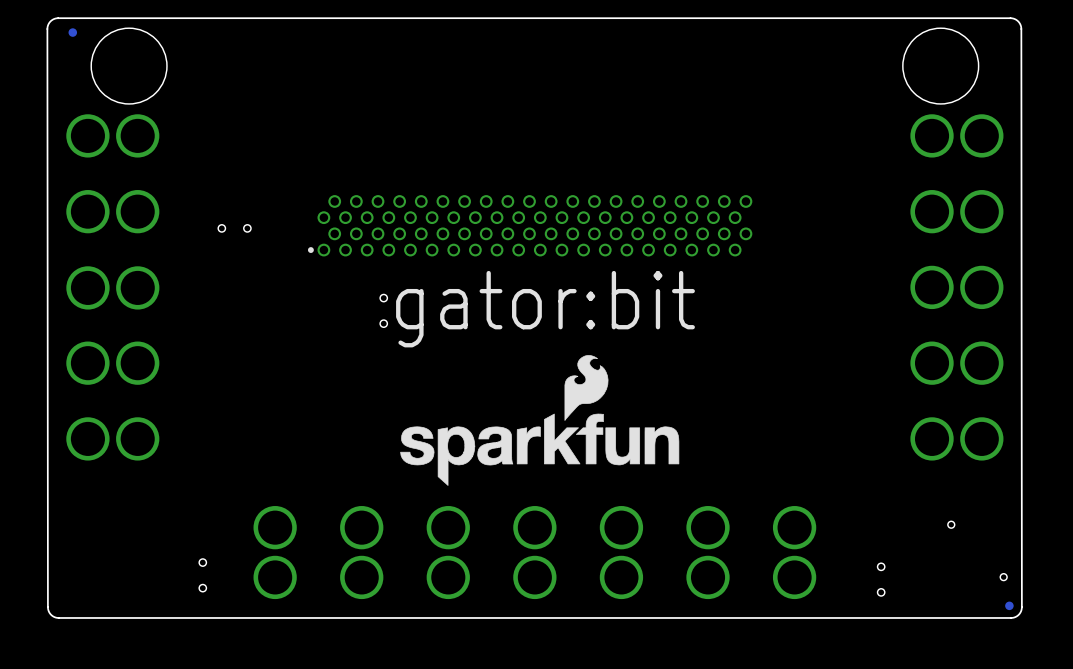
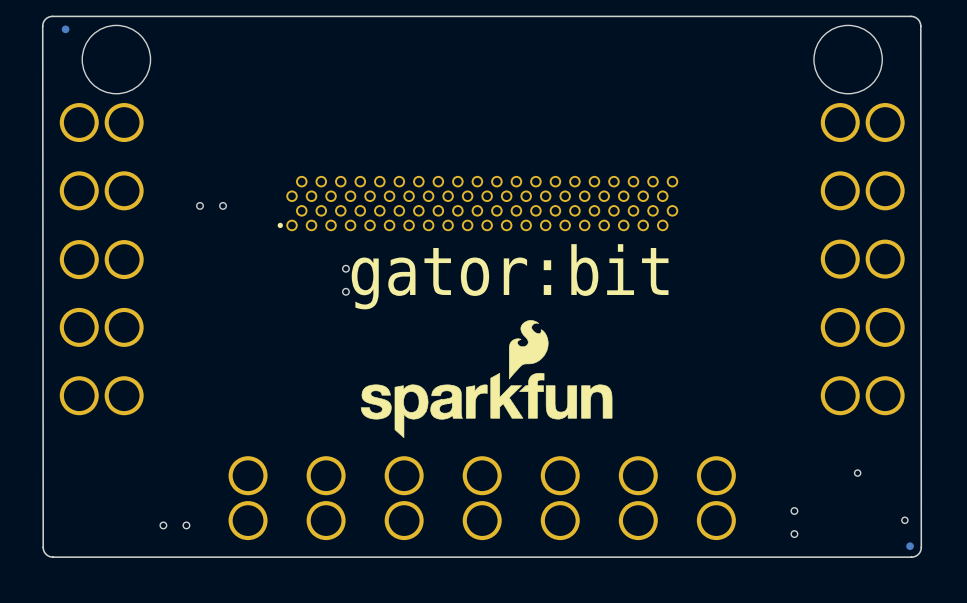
part rotation: 0° (202, 575) -> 90° clockwise (174, 525)

